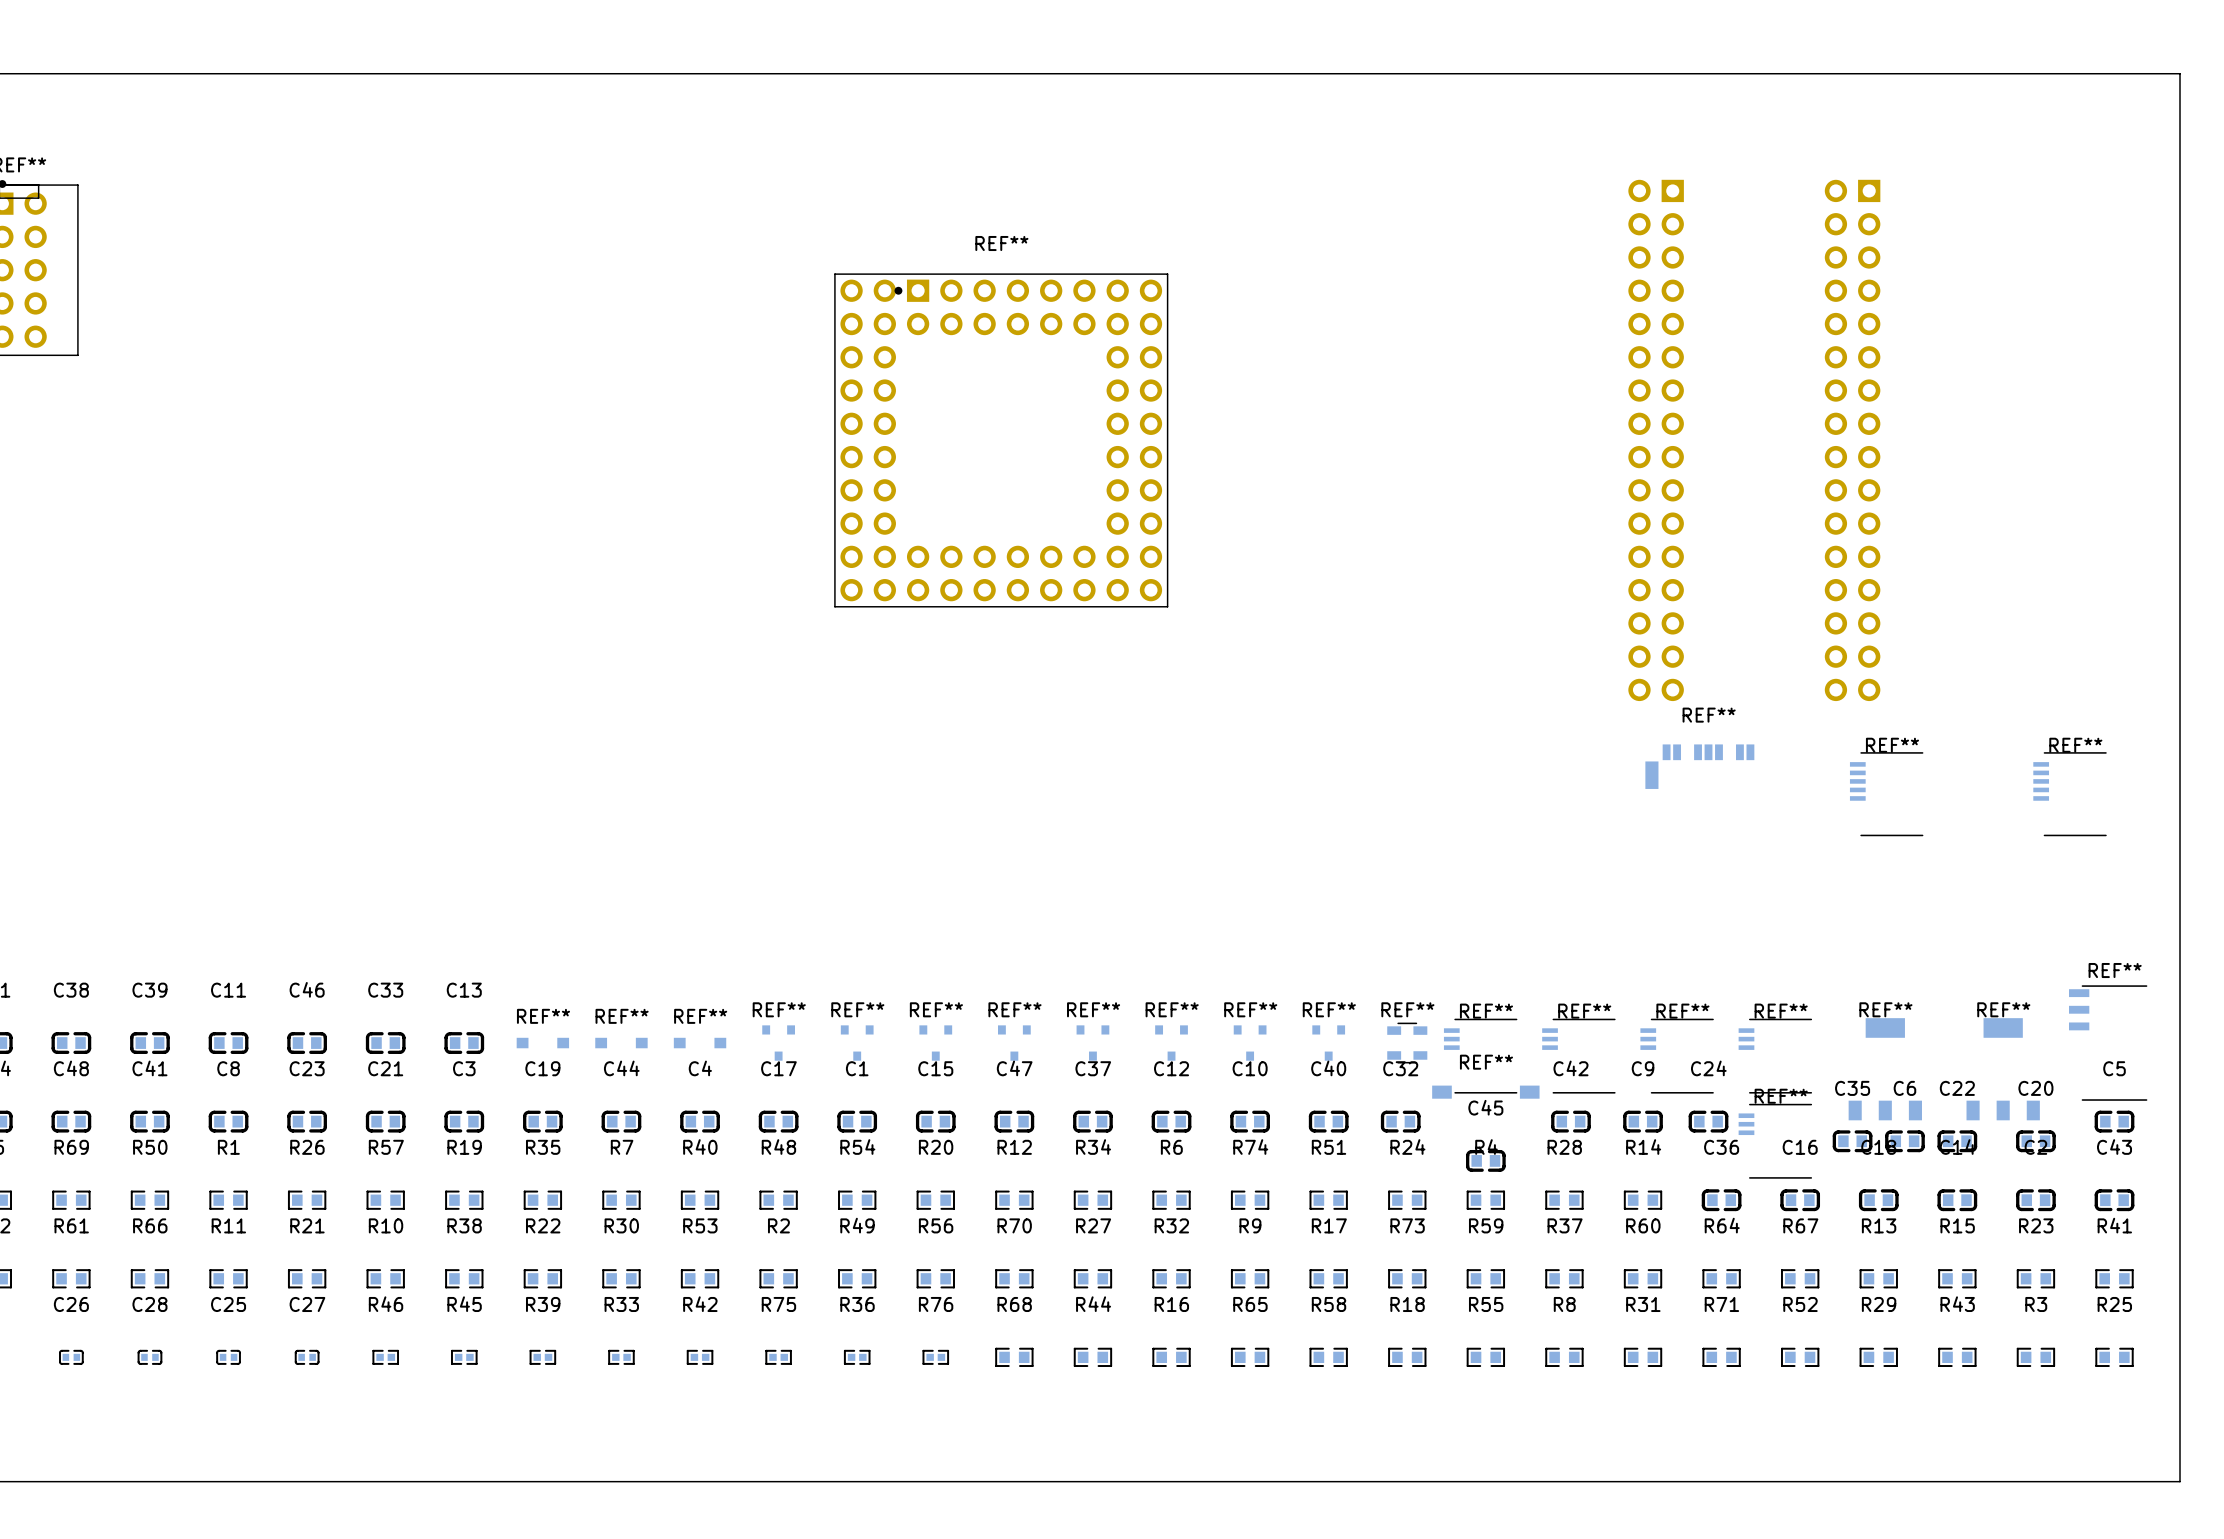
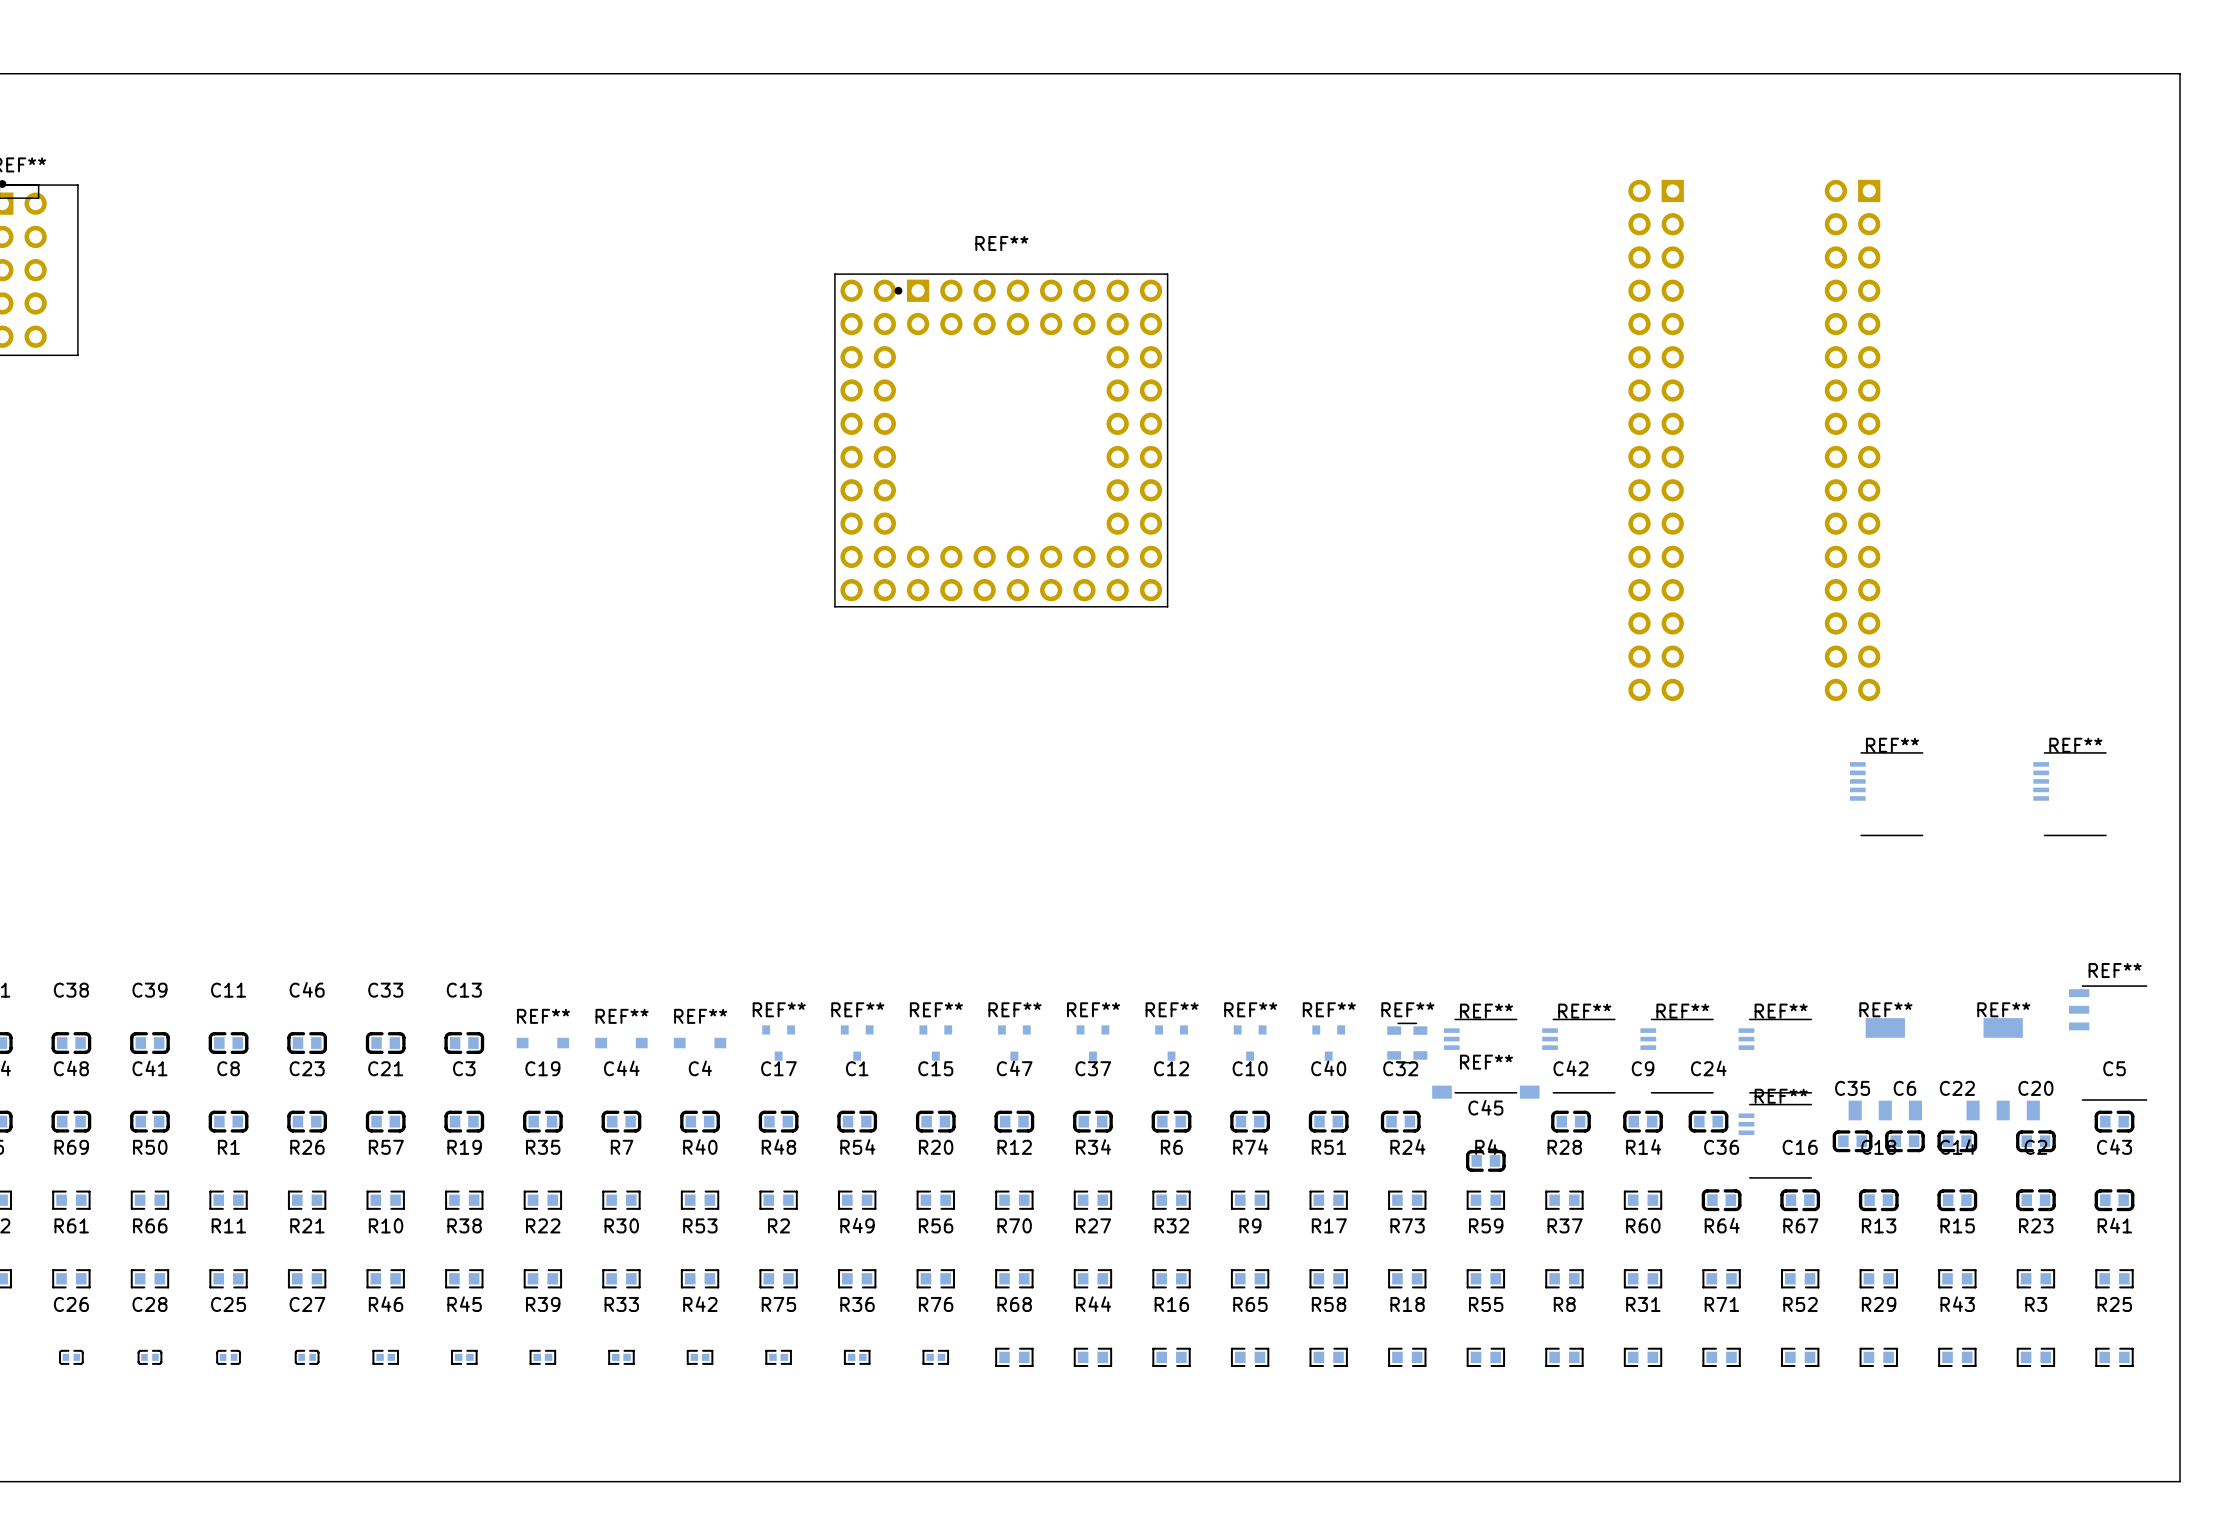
REF**: (1699, 766) -> none

